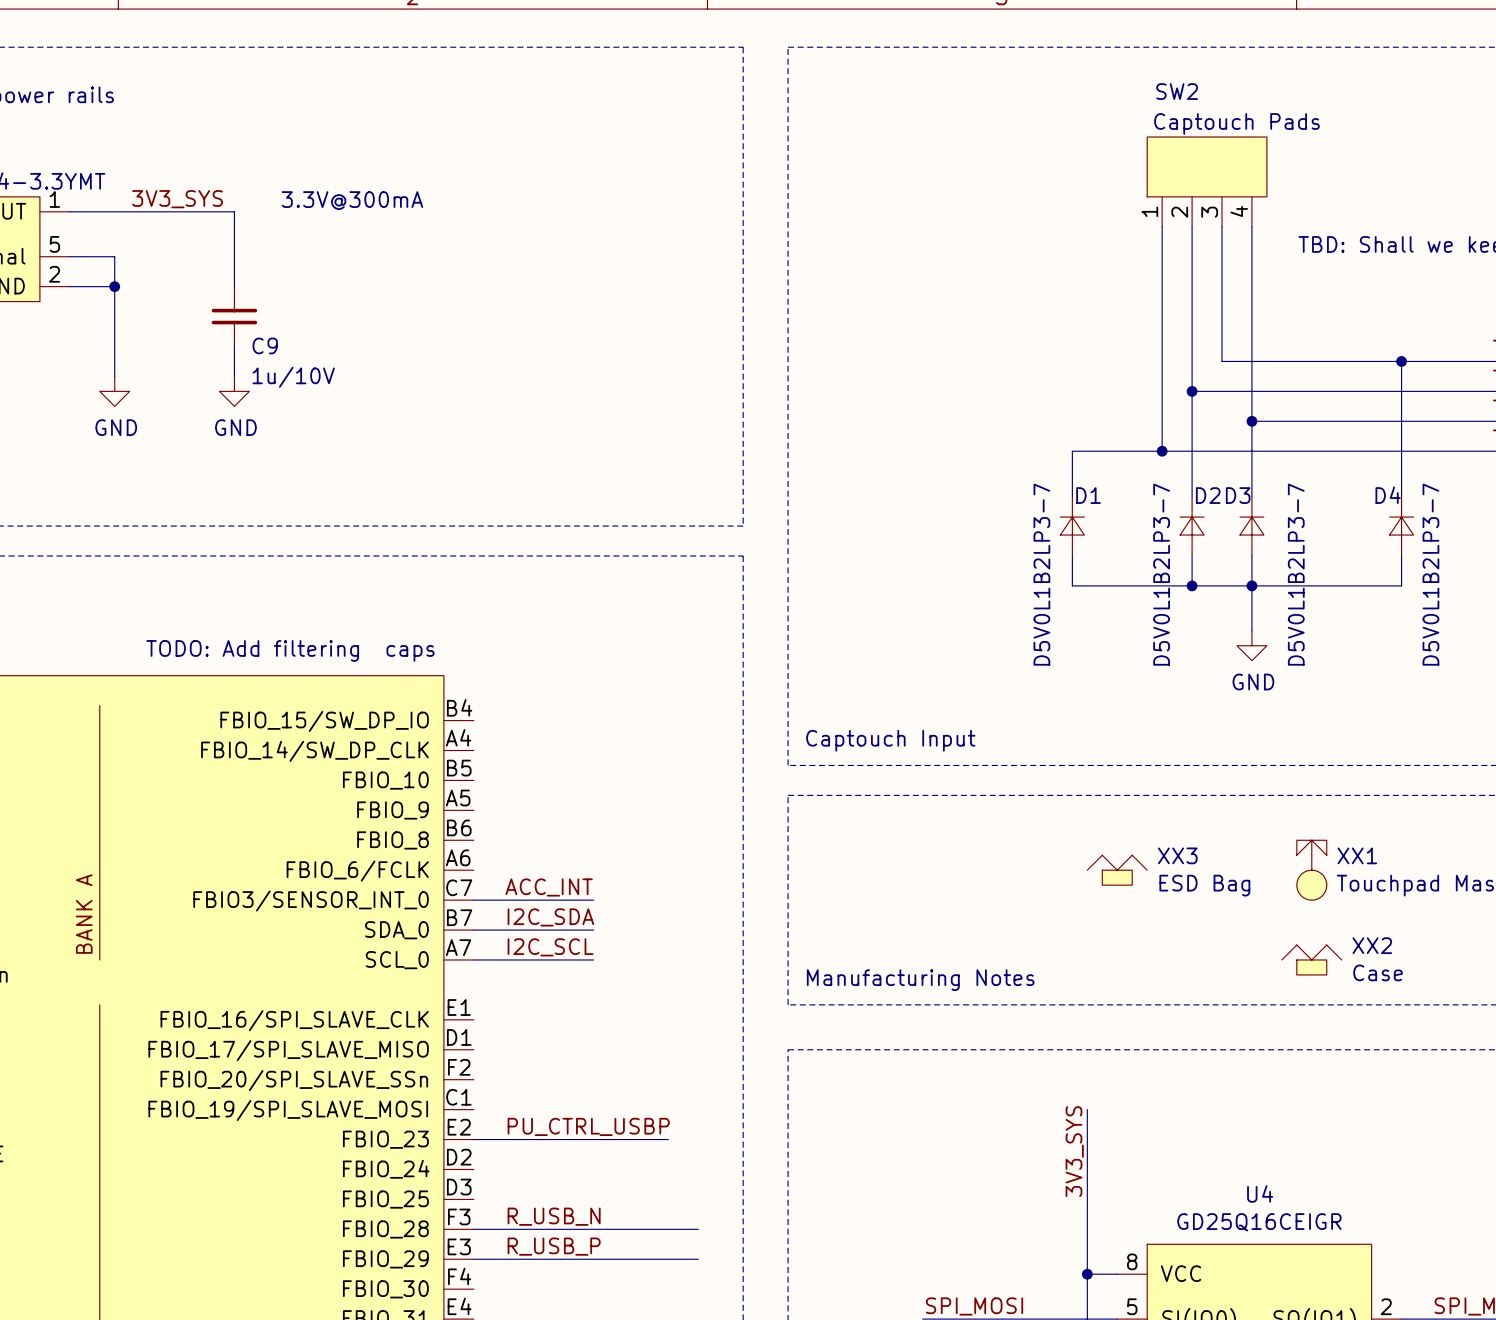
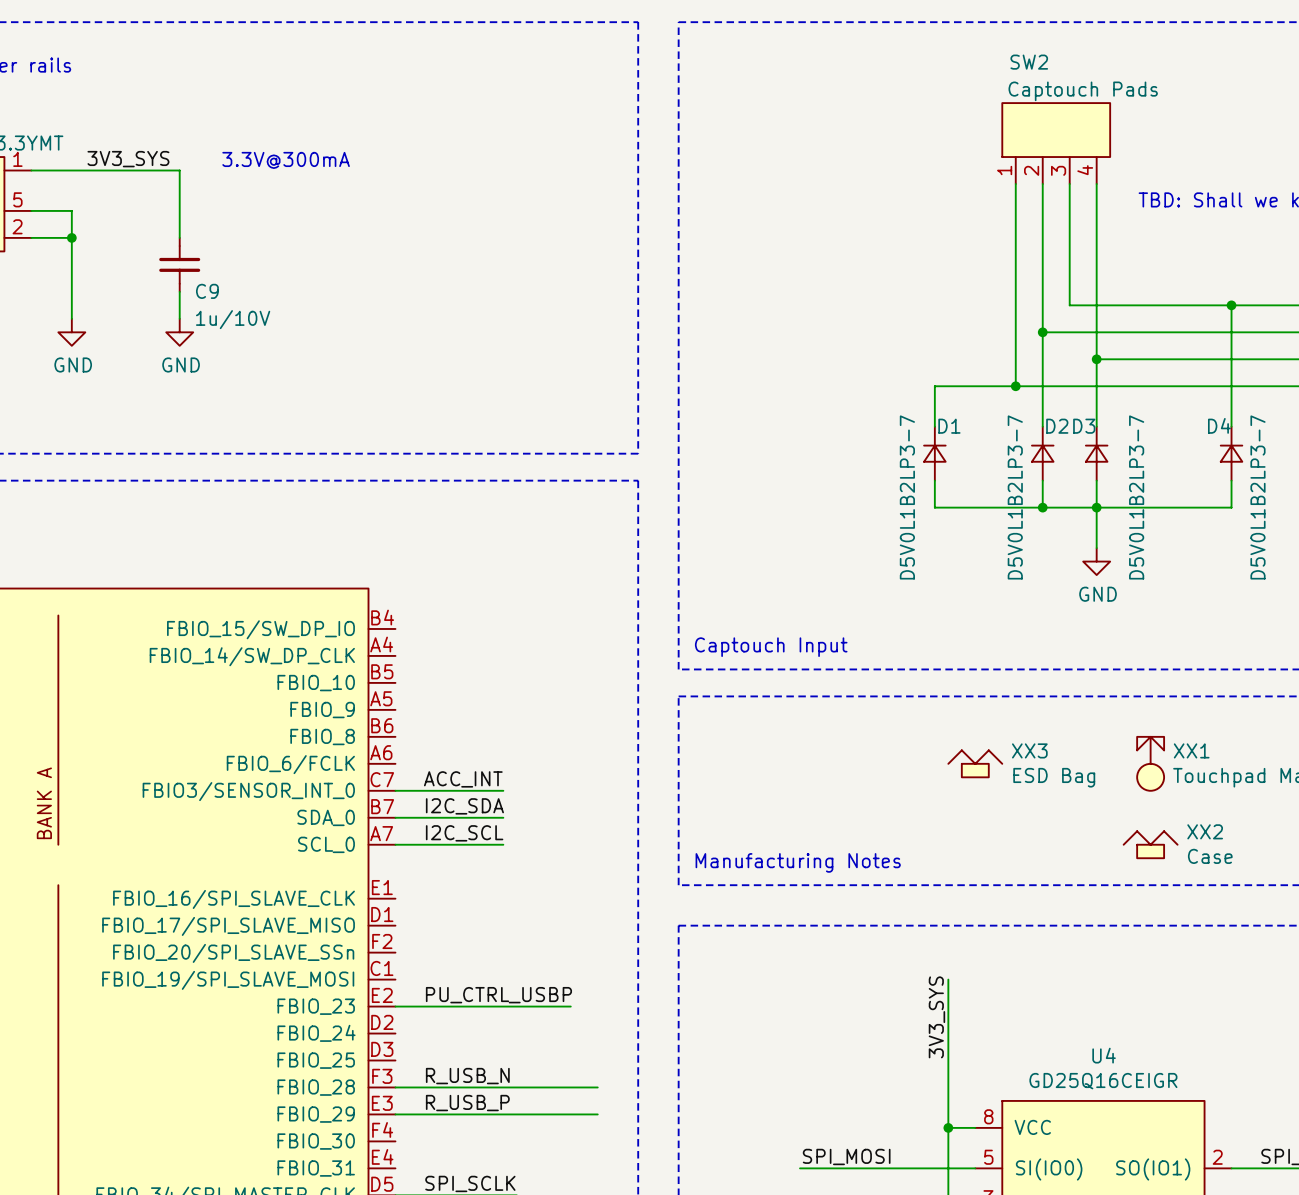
text: TODO: Add filtering caps (290, 650) -> none

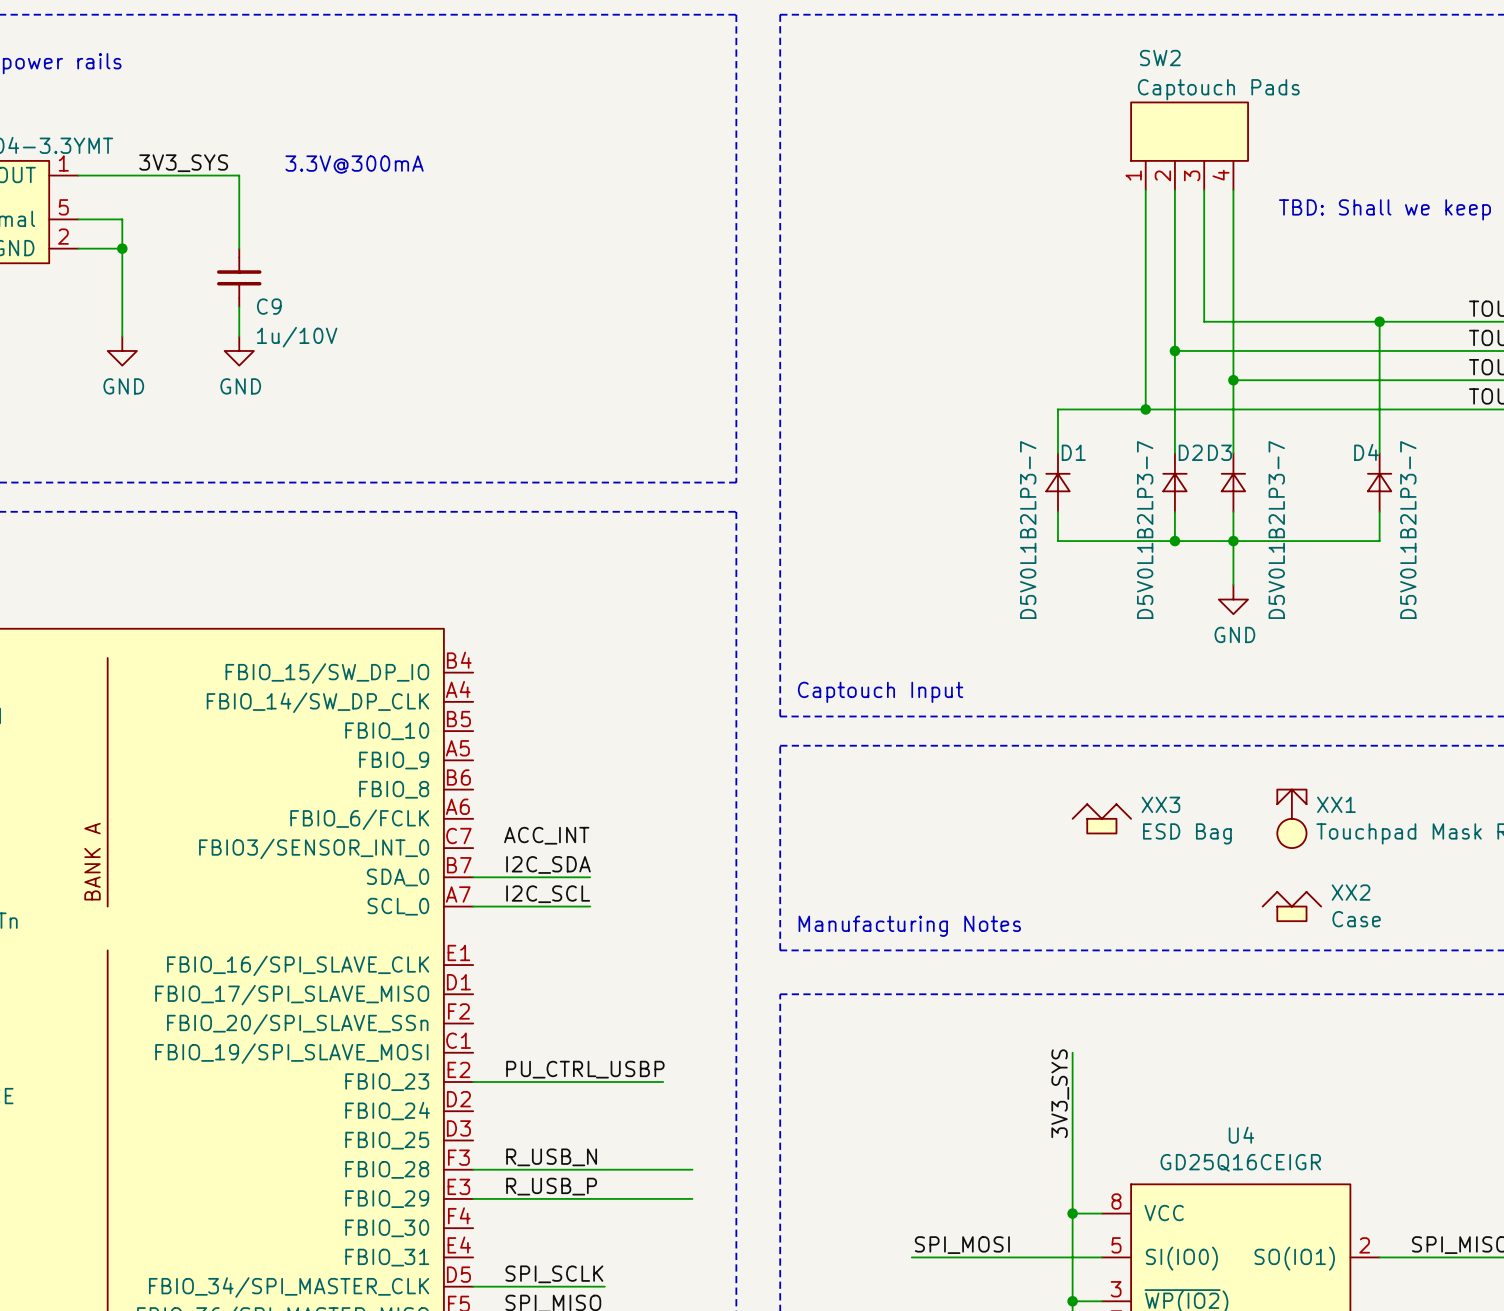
wire: (395, 790) (503, 790) -> none

